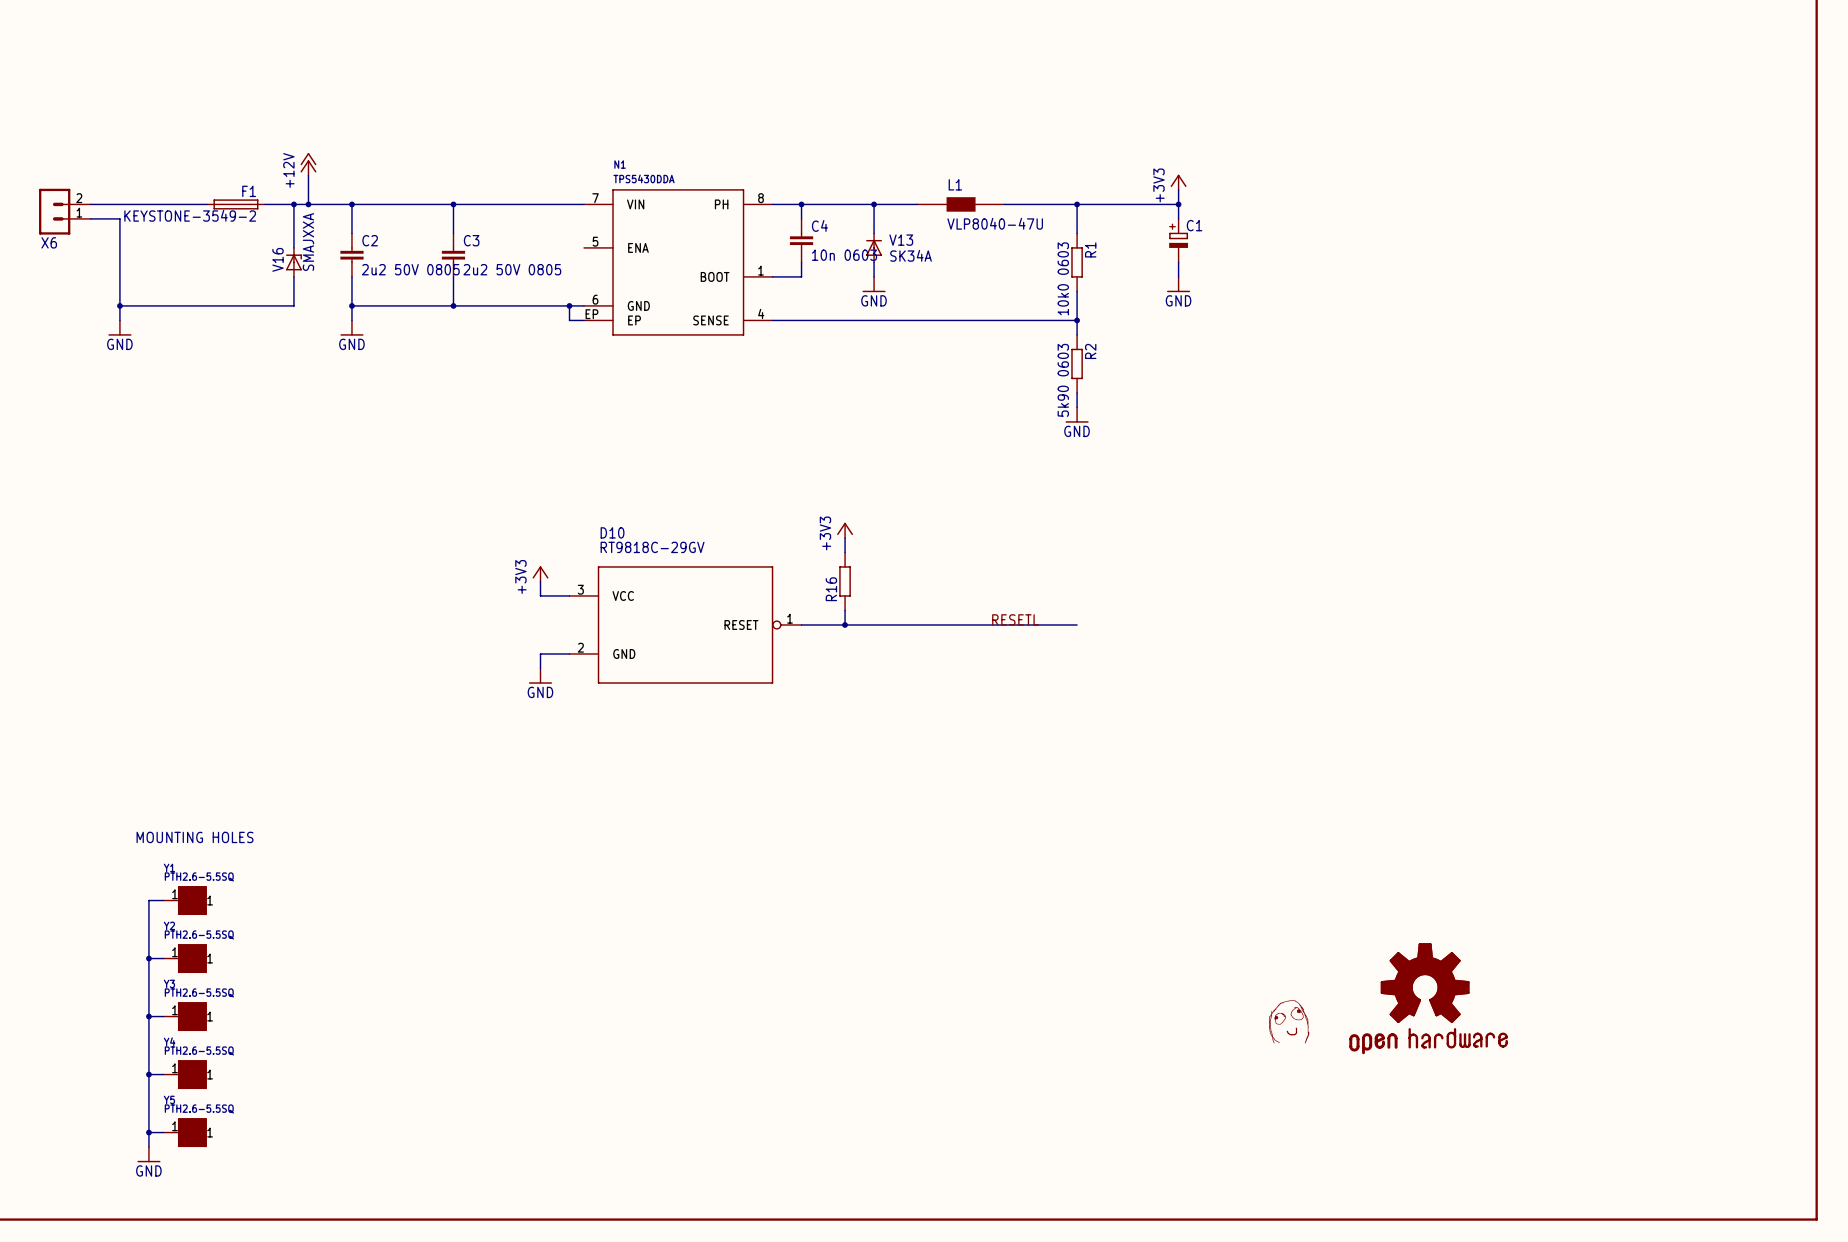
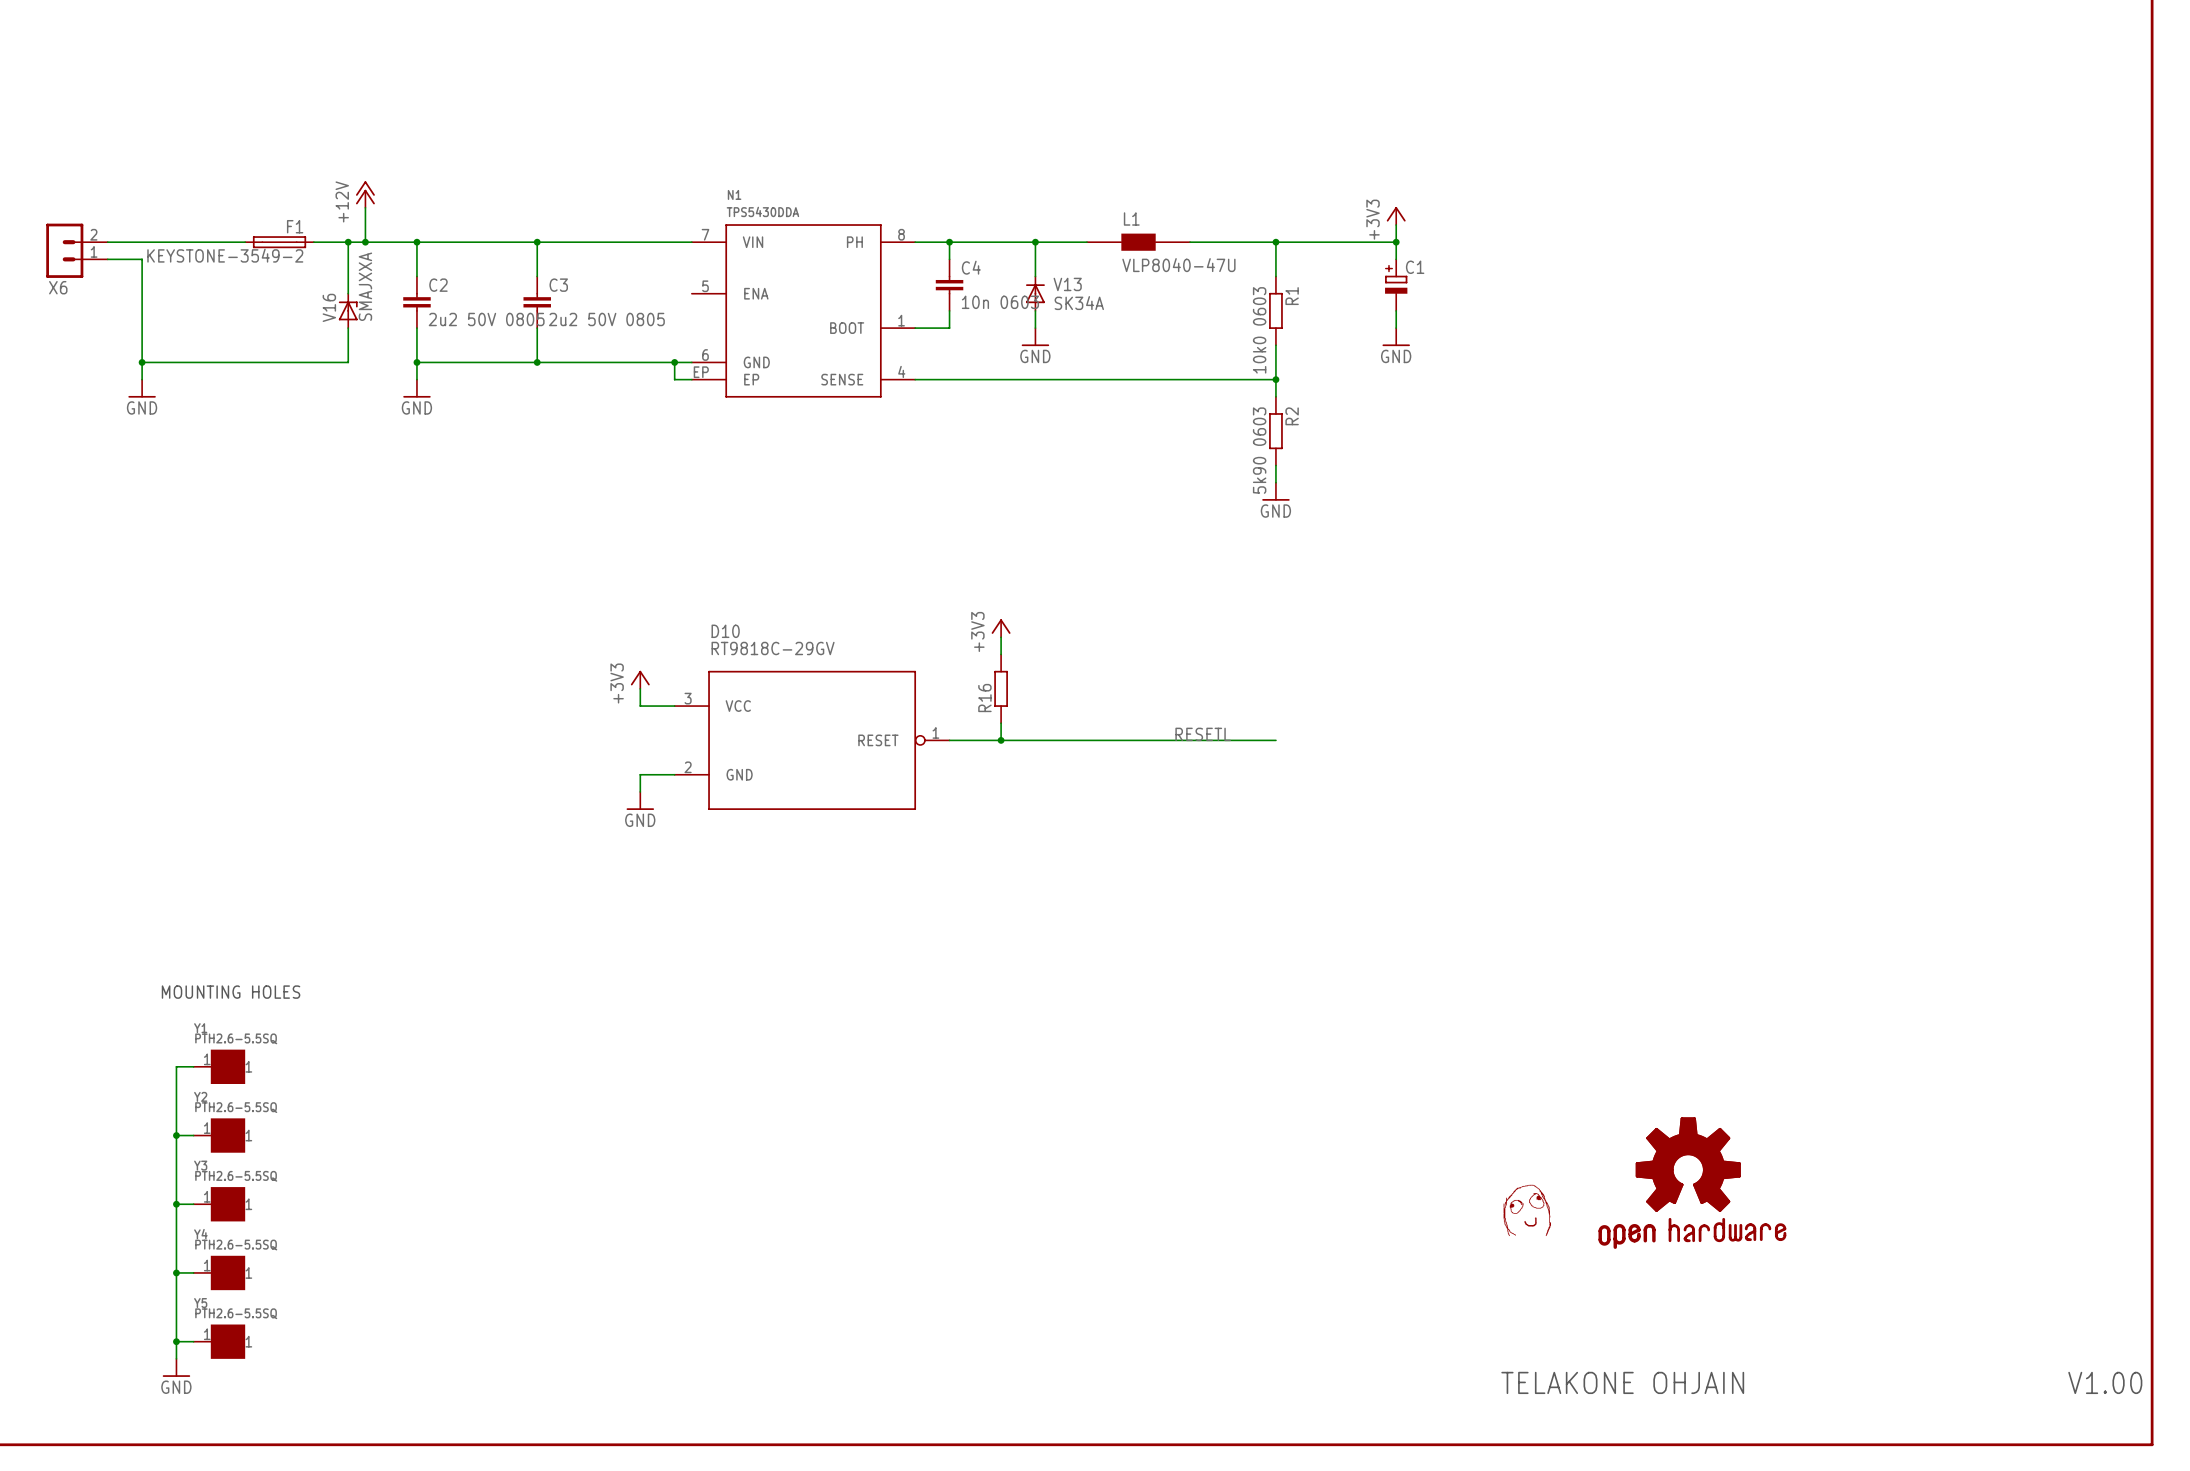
text: none -> TELAKONE OHJAIN (1622, 1382)
text: none -> V1.00 (2105, 1382)

